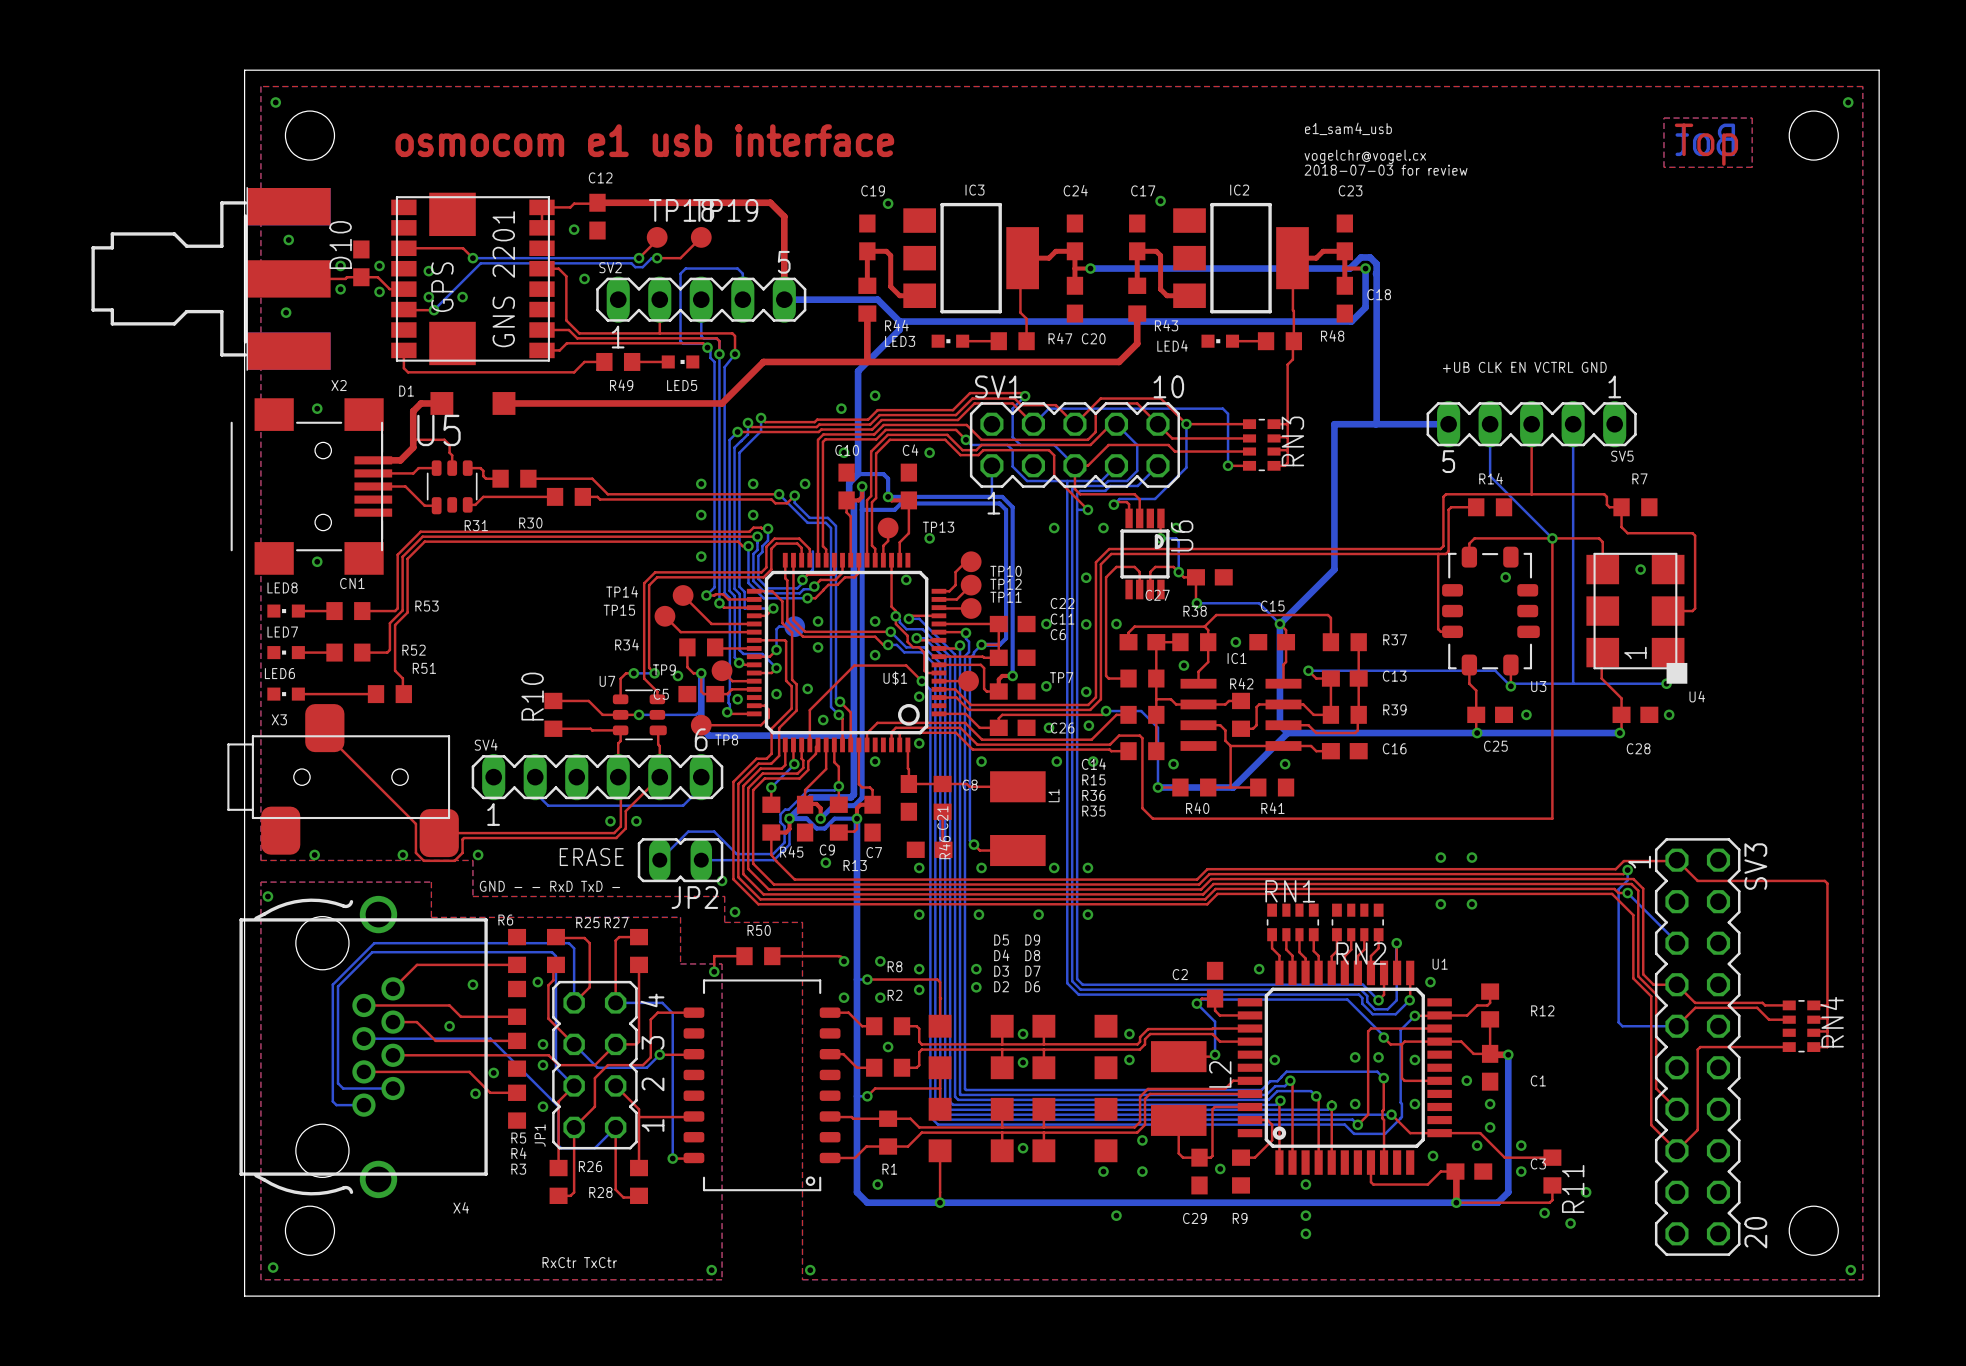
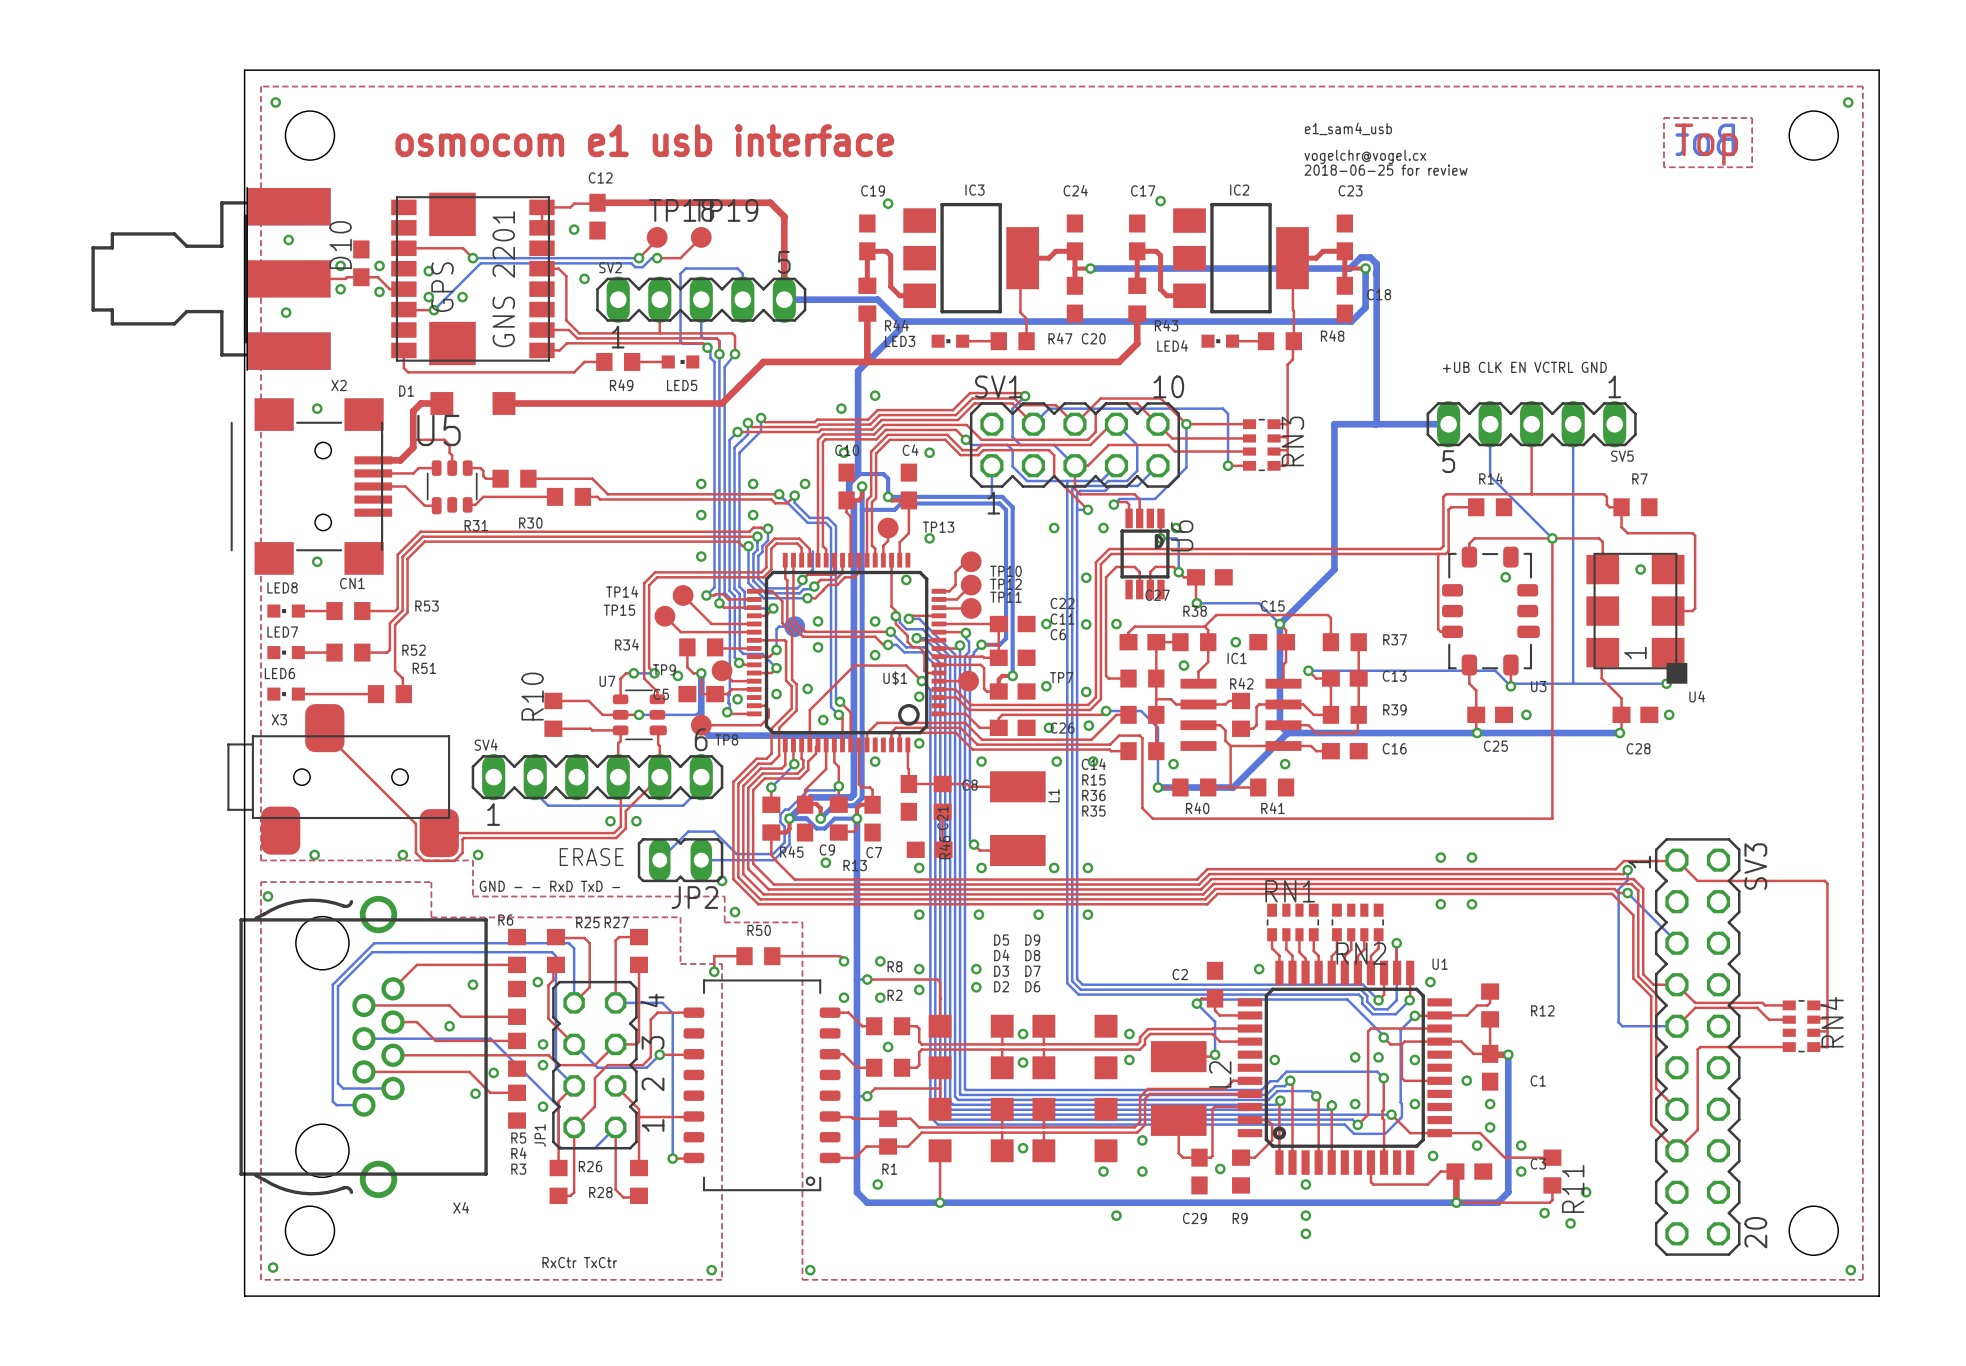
text: 2018-07-03 for review (1386, 170) -> 2018-06-25 for review (1386, 170)

